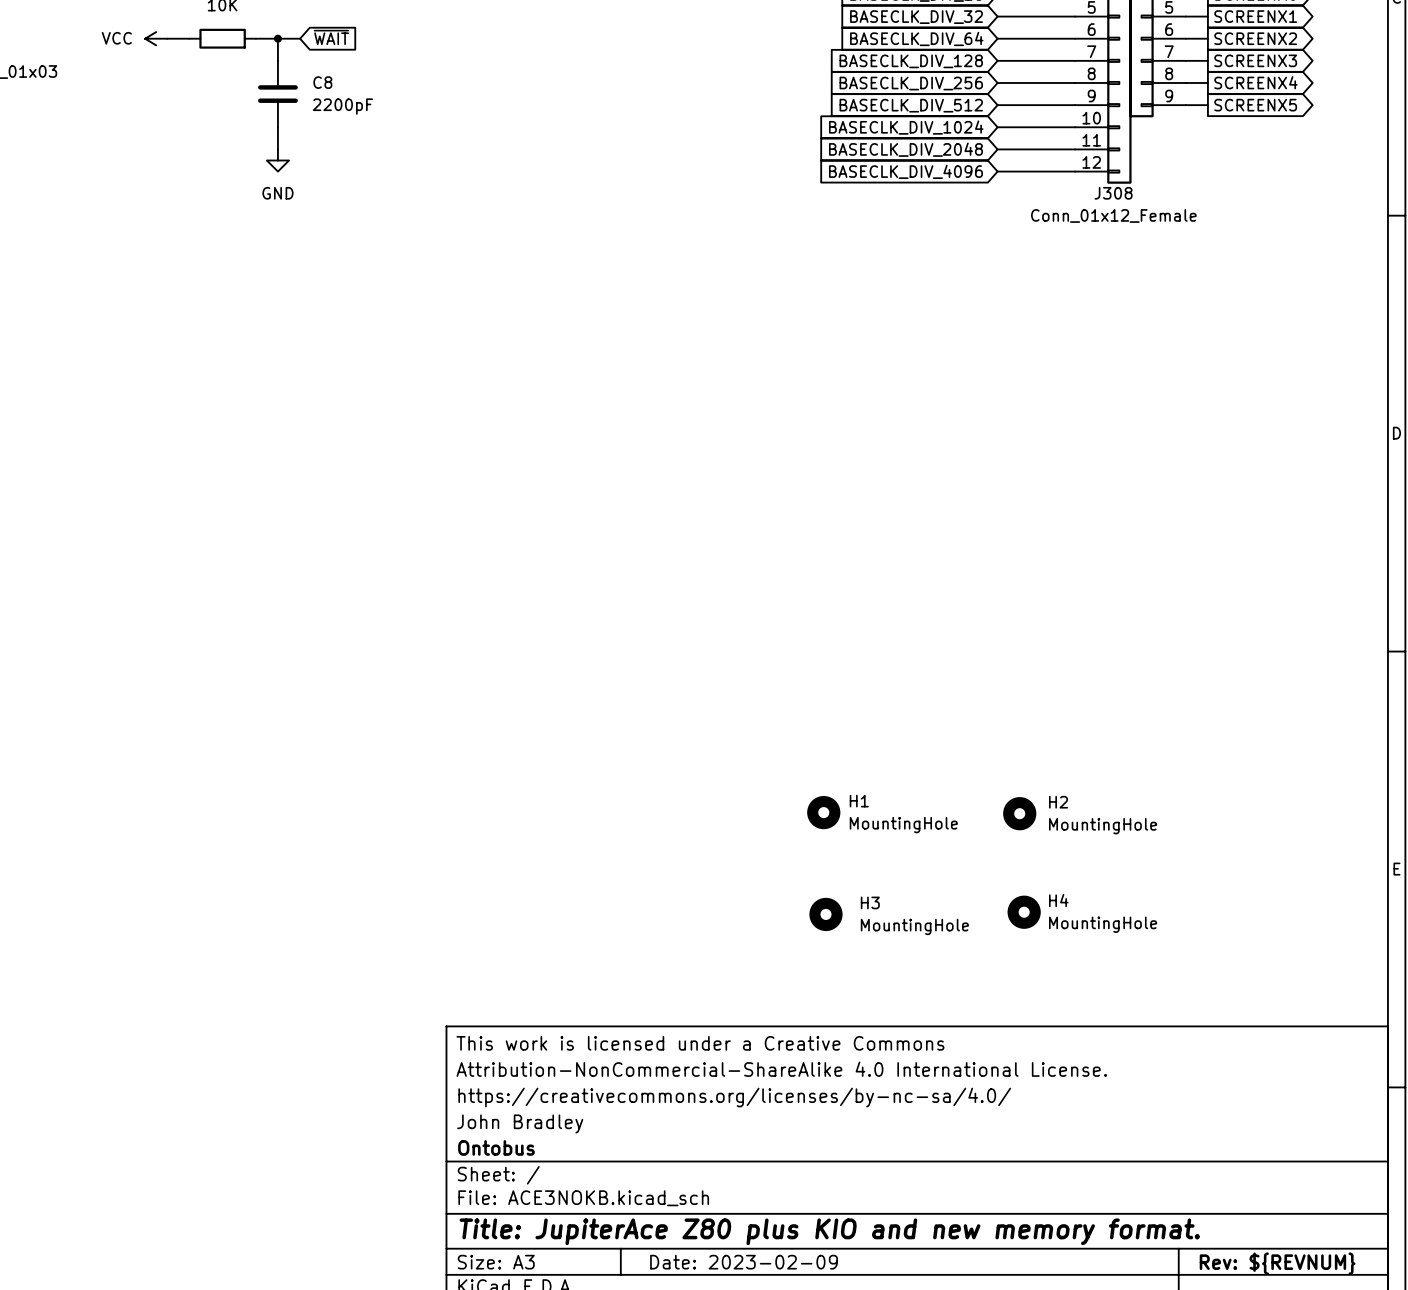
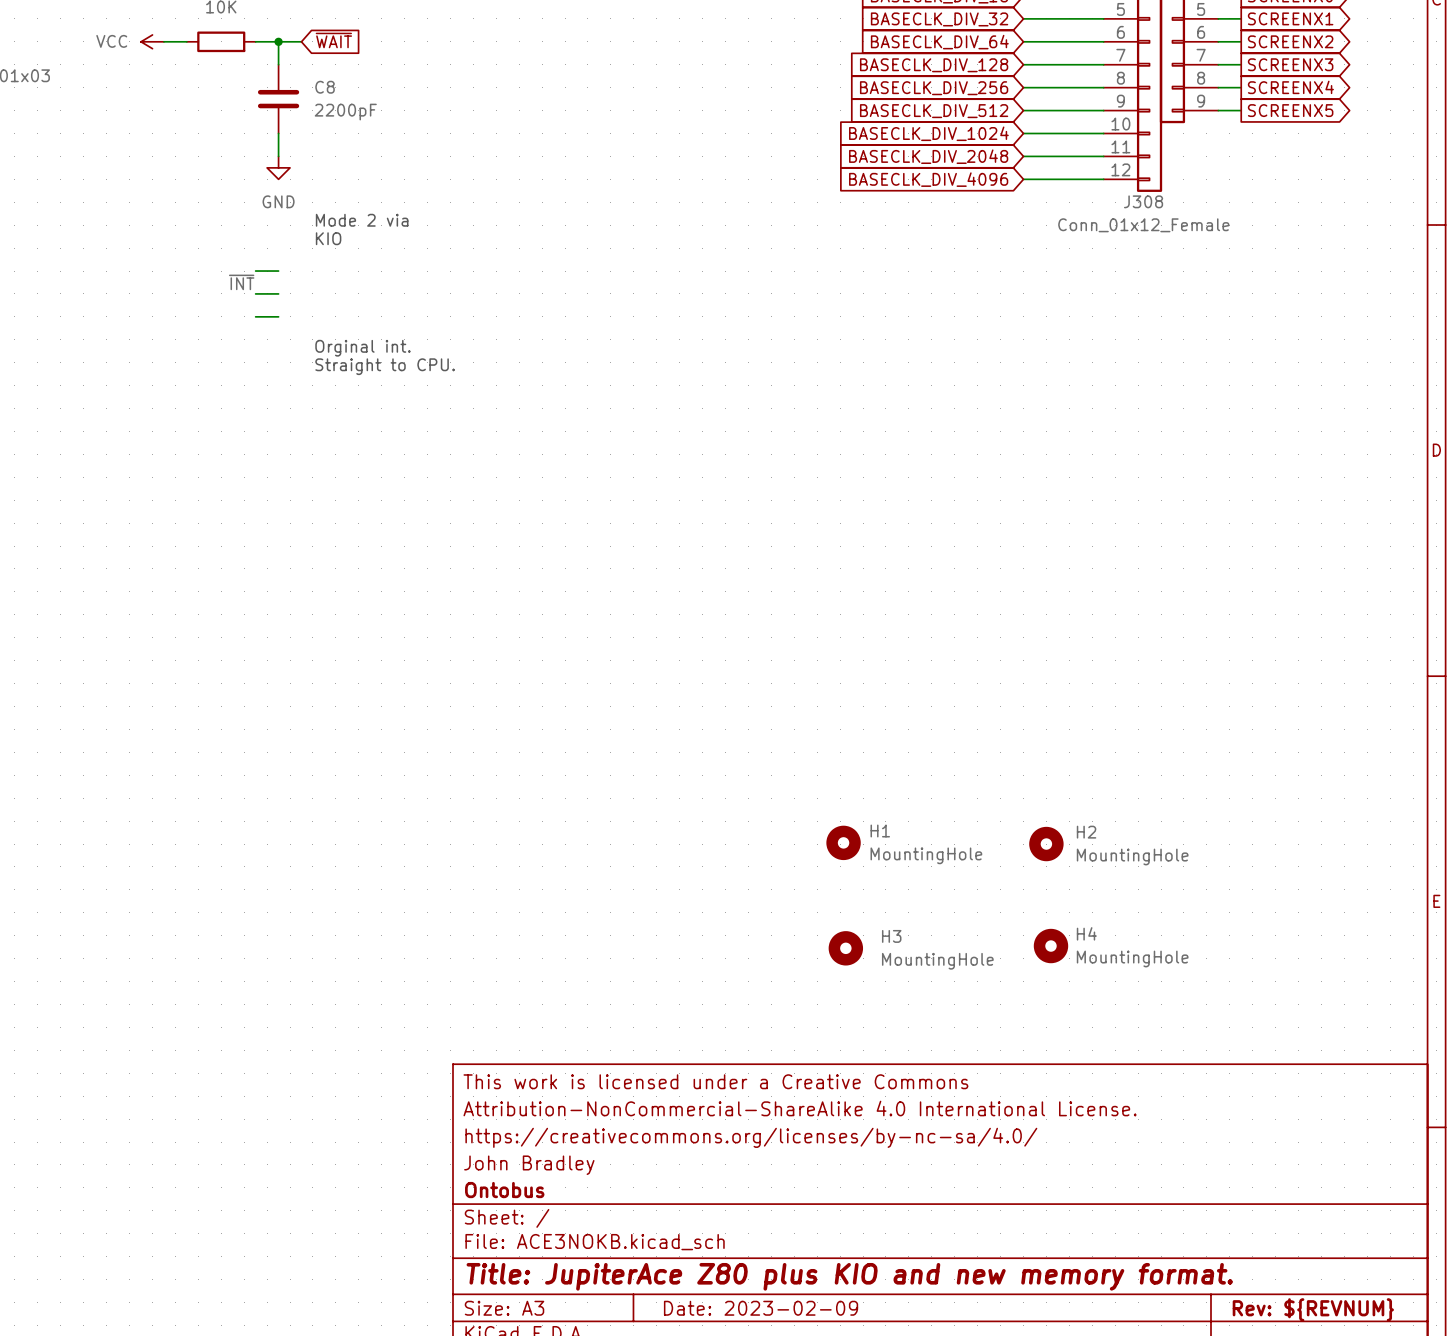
text: none -> Mode 2 via (362, 220)
text: none -> KIO (328, 238)
wire: none -> (255, 271) (278, 271)
label: none -> ~{INT} (241, 282)
wire: none -> (255, 293) (278, 293)
wire: none -> (255, 316) (278, 316)
text: none -> Orginal int. (362, 348)
text: none -> Straight to CPU. (385, 366)

